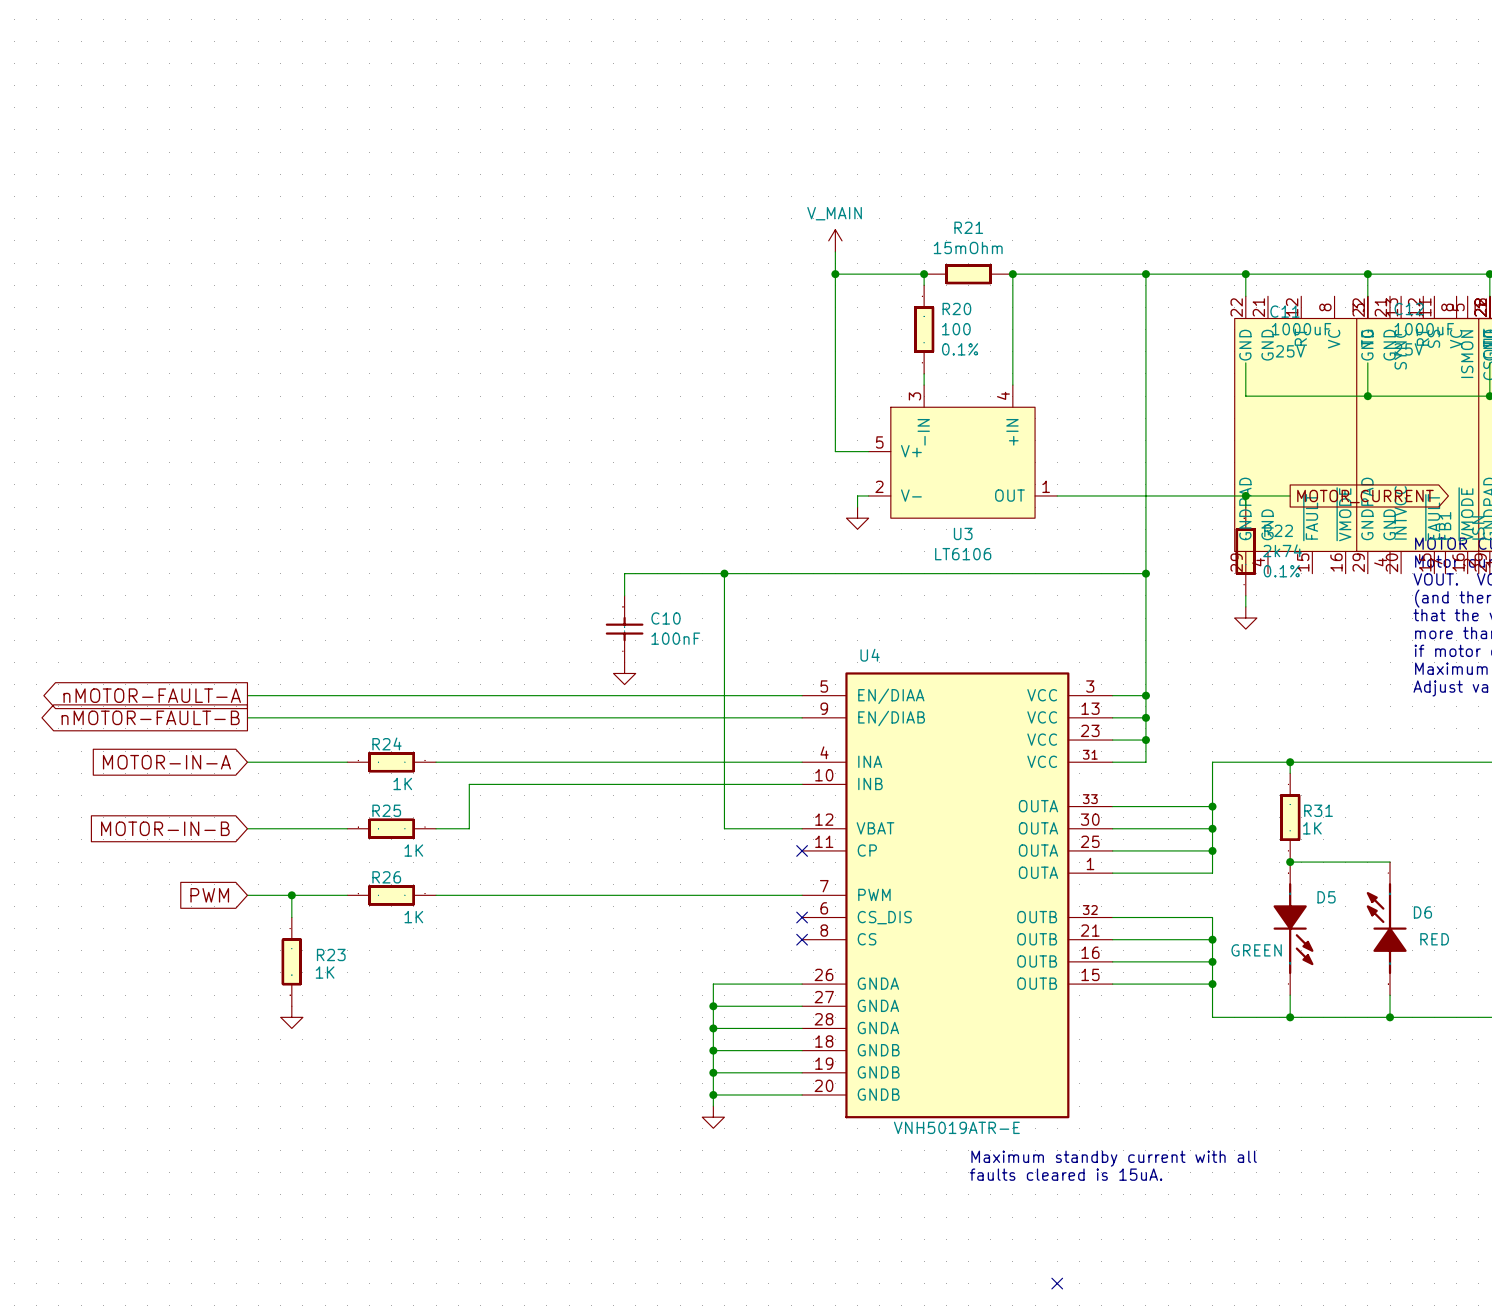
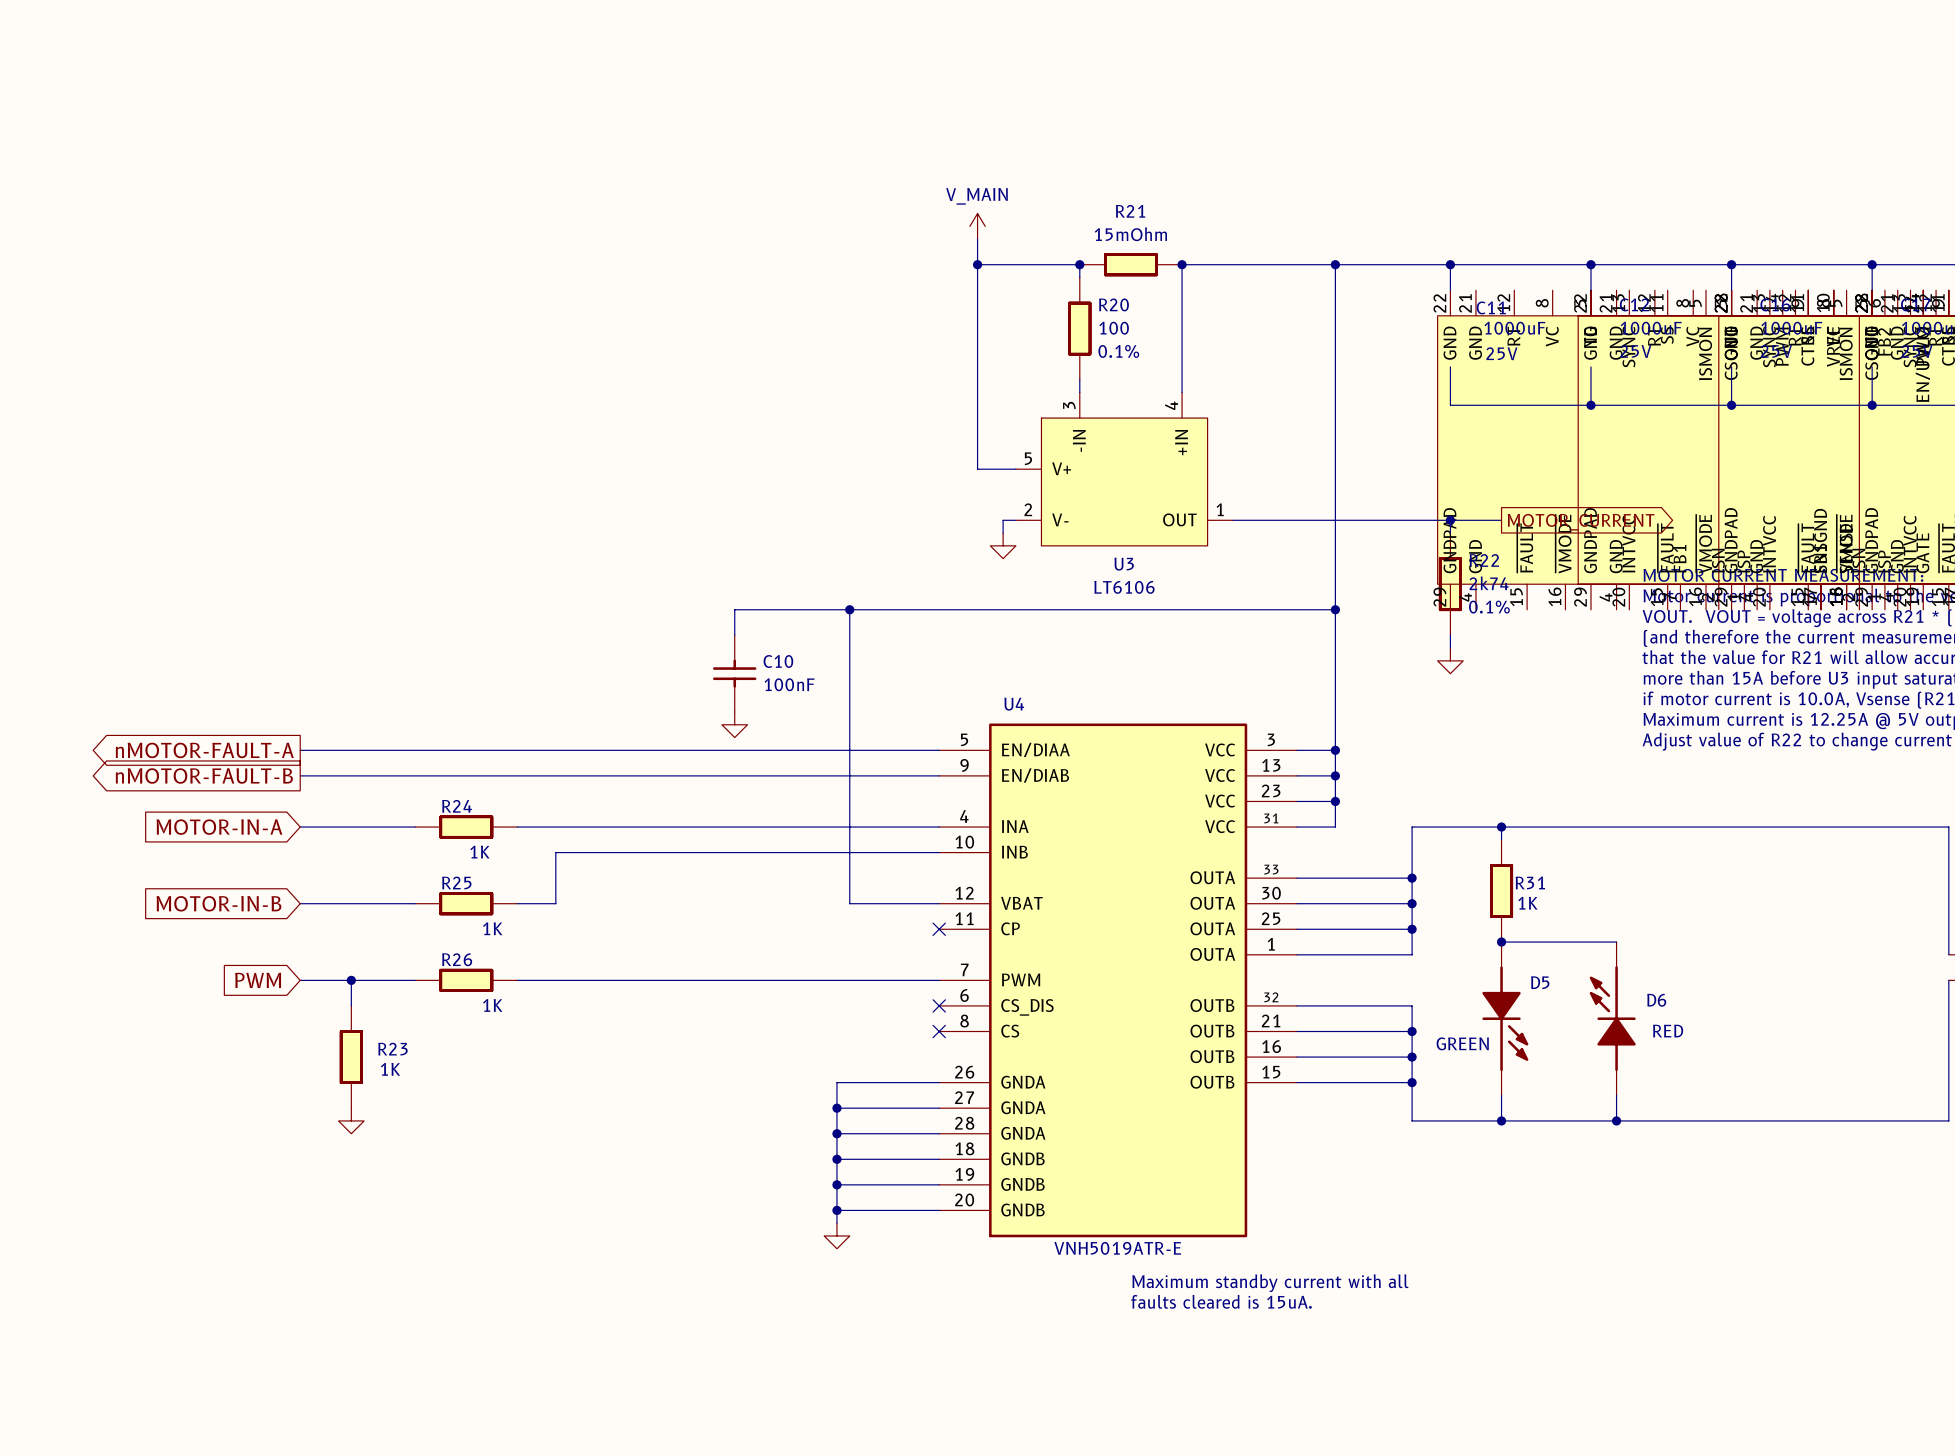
no-connect mark: (1057, 1283) -> none

